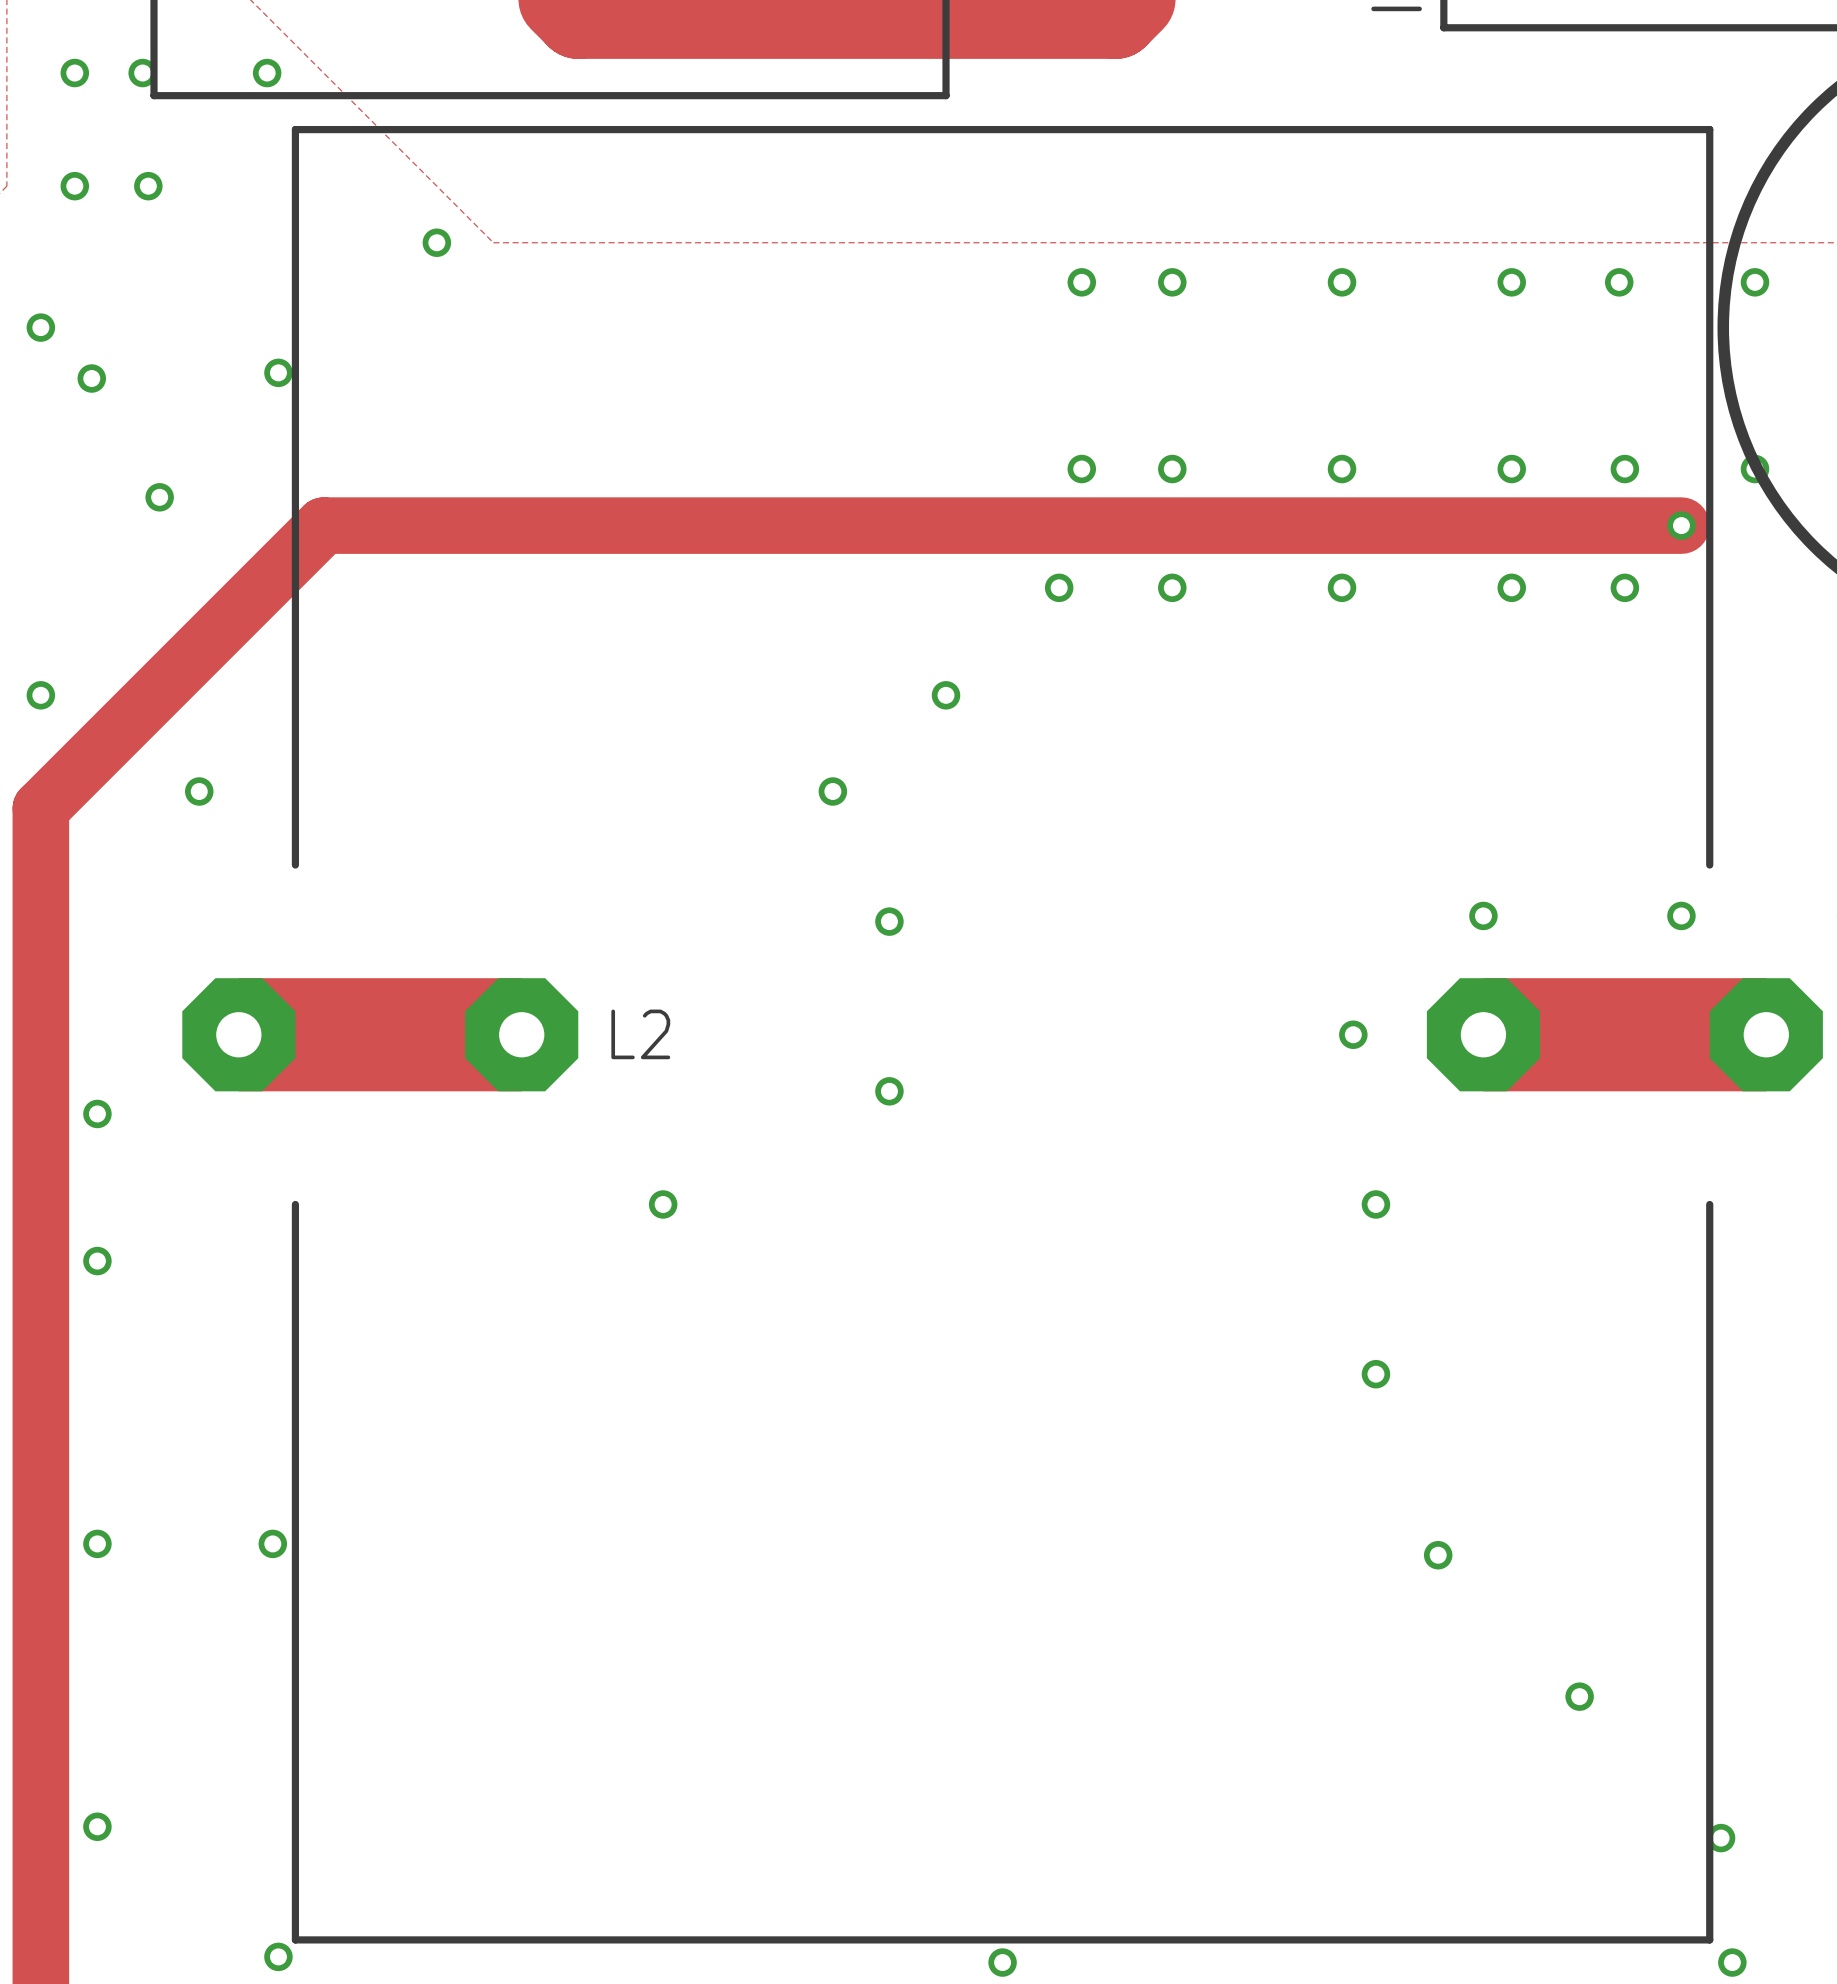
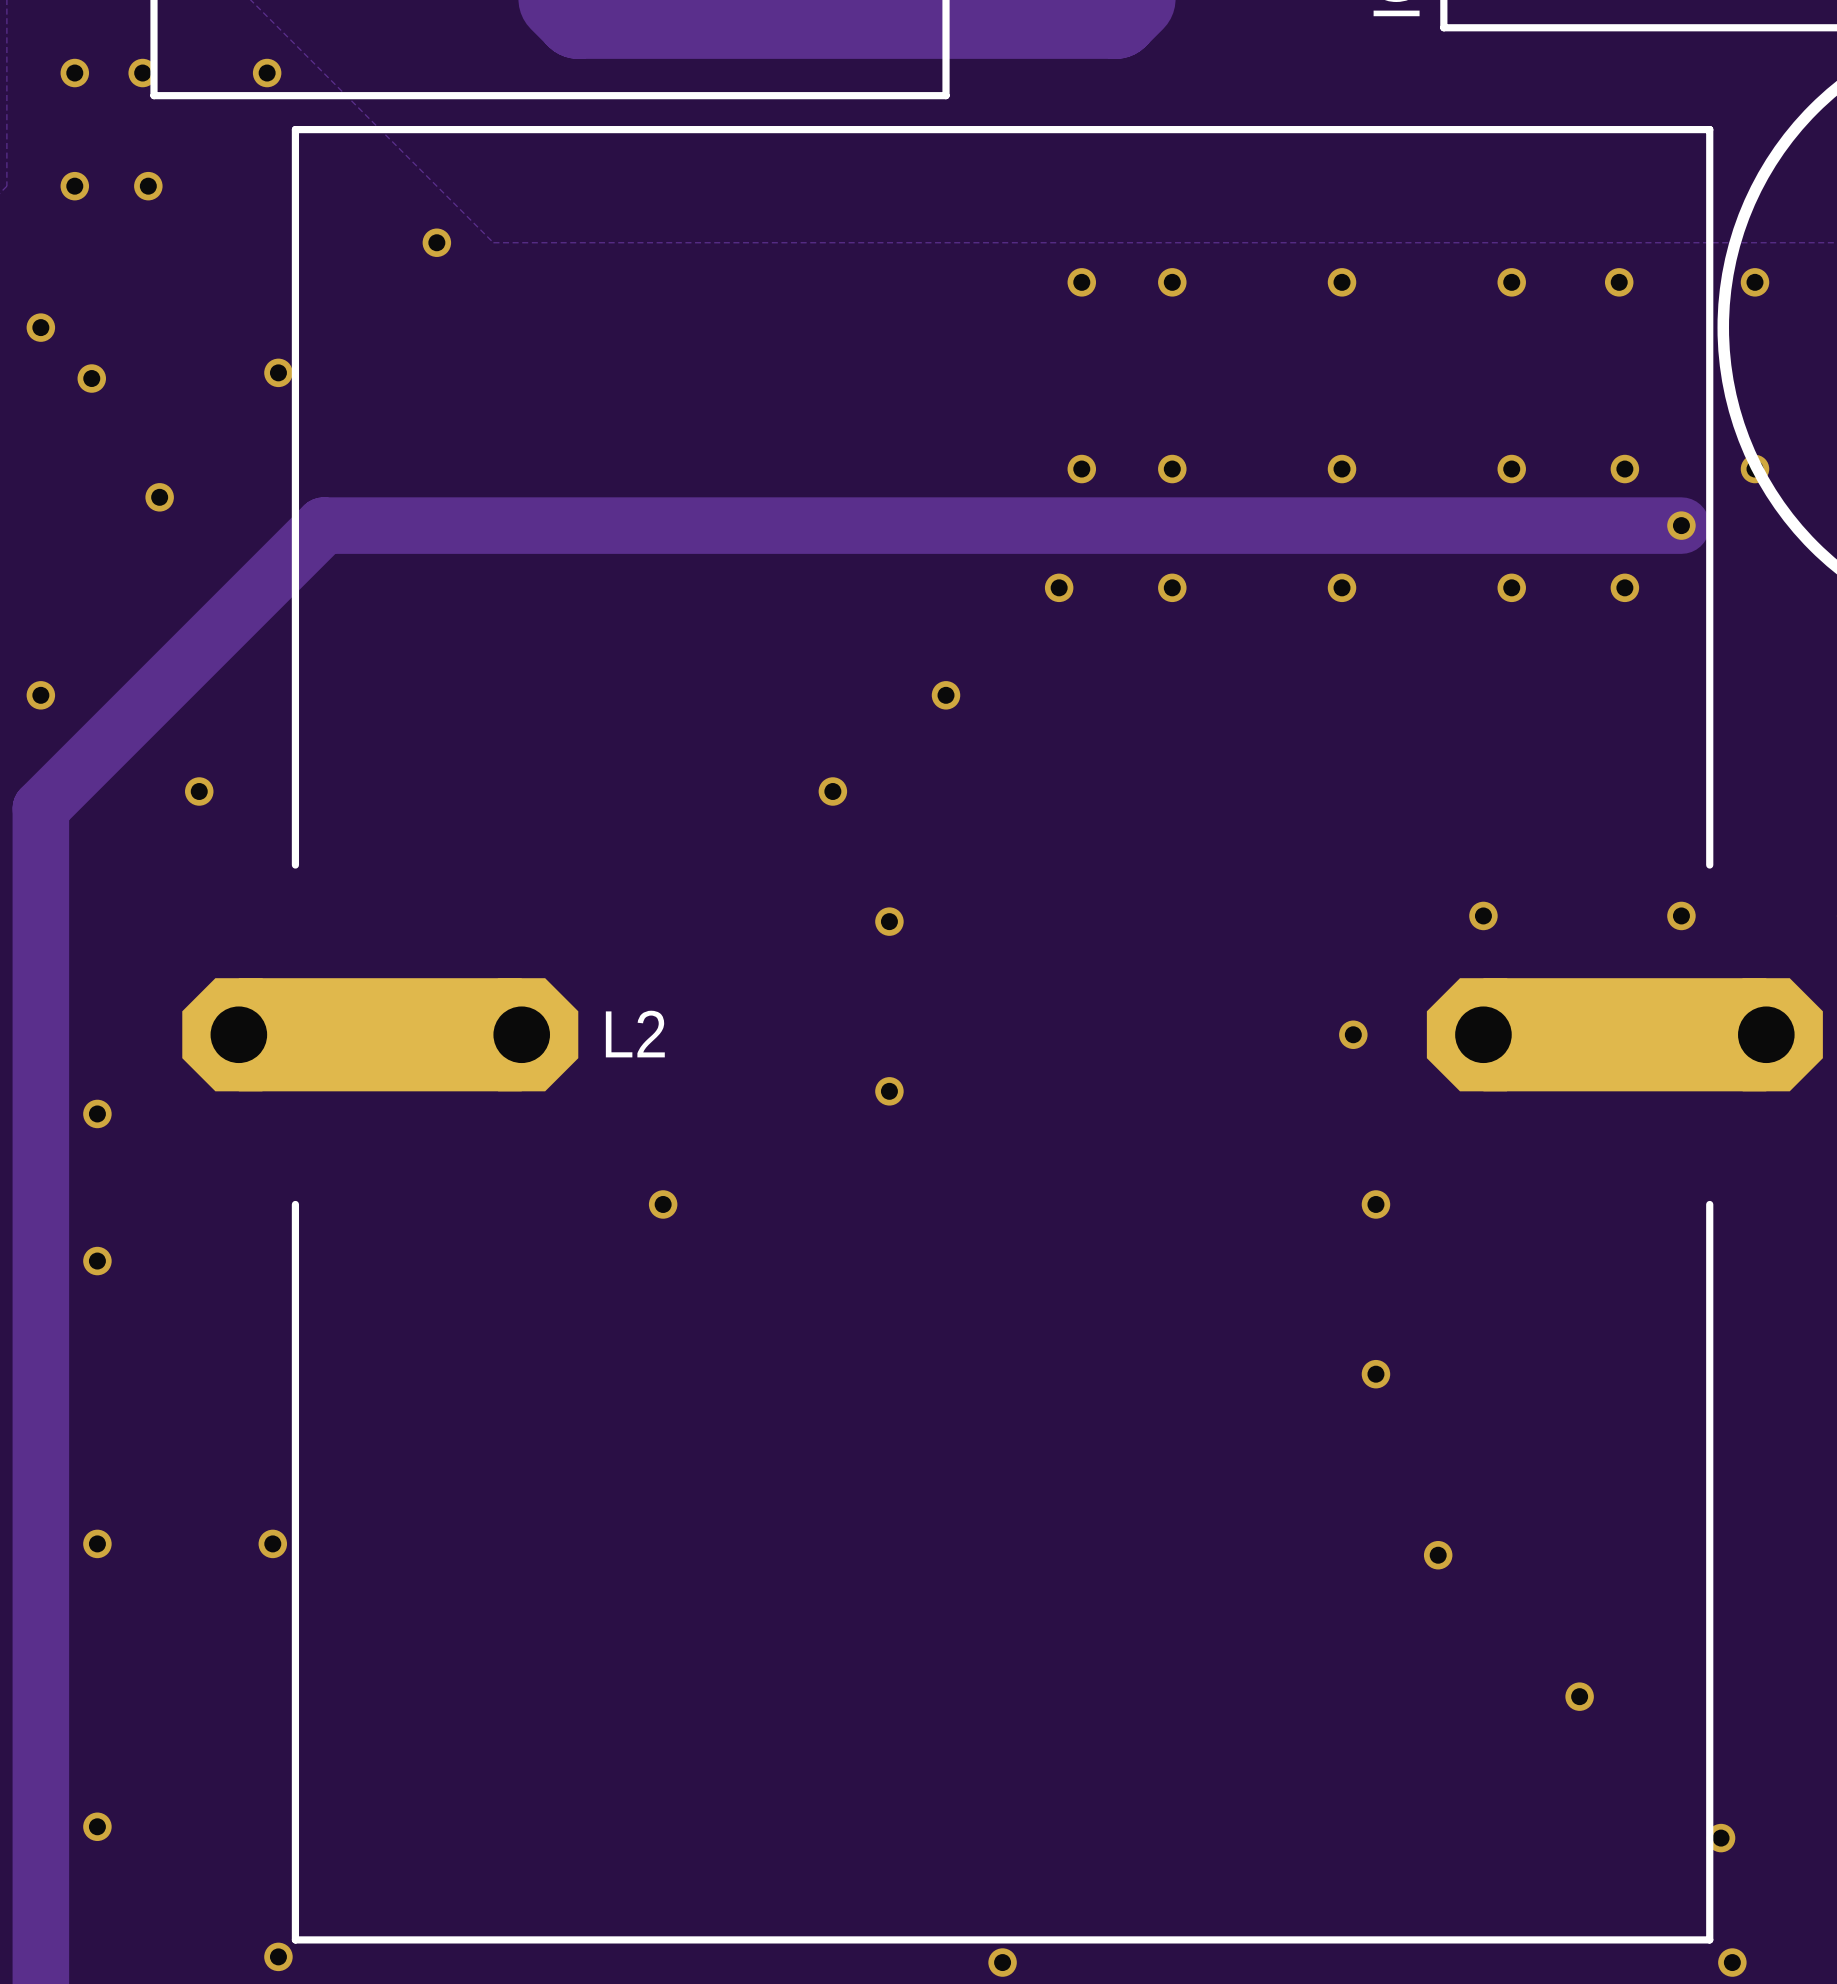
L2 footprint: [182, 126, 1823, 1944] -> [182, 126, 1823, 1944]

